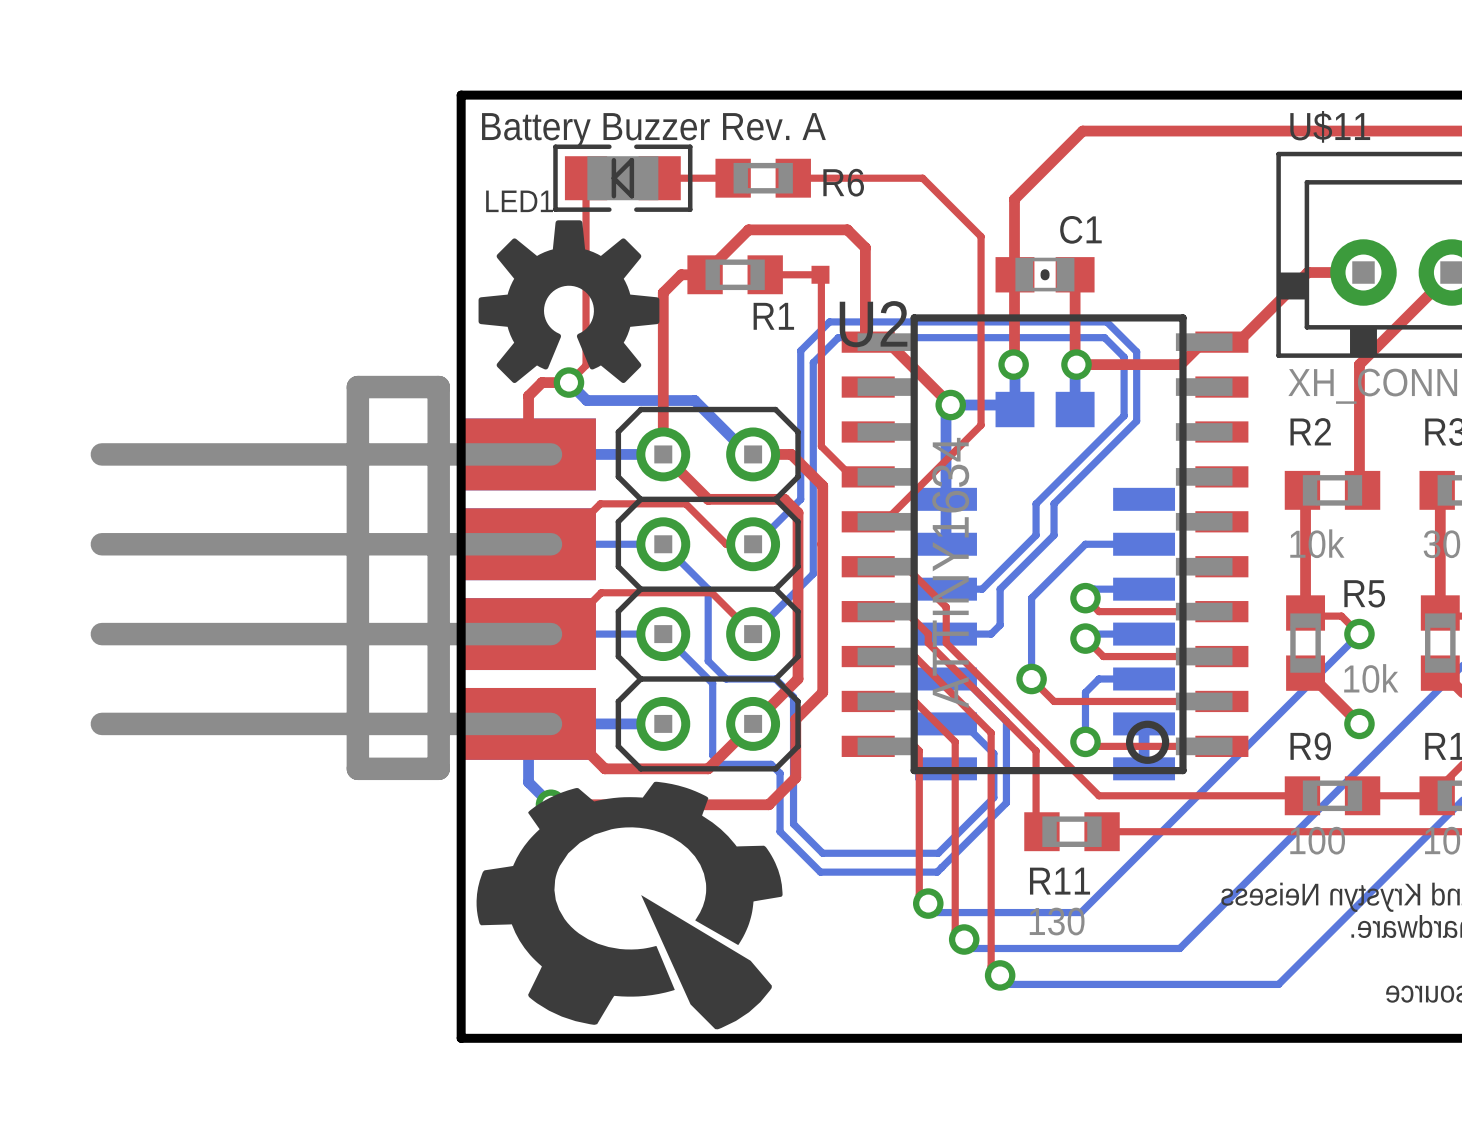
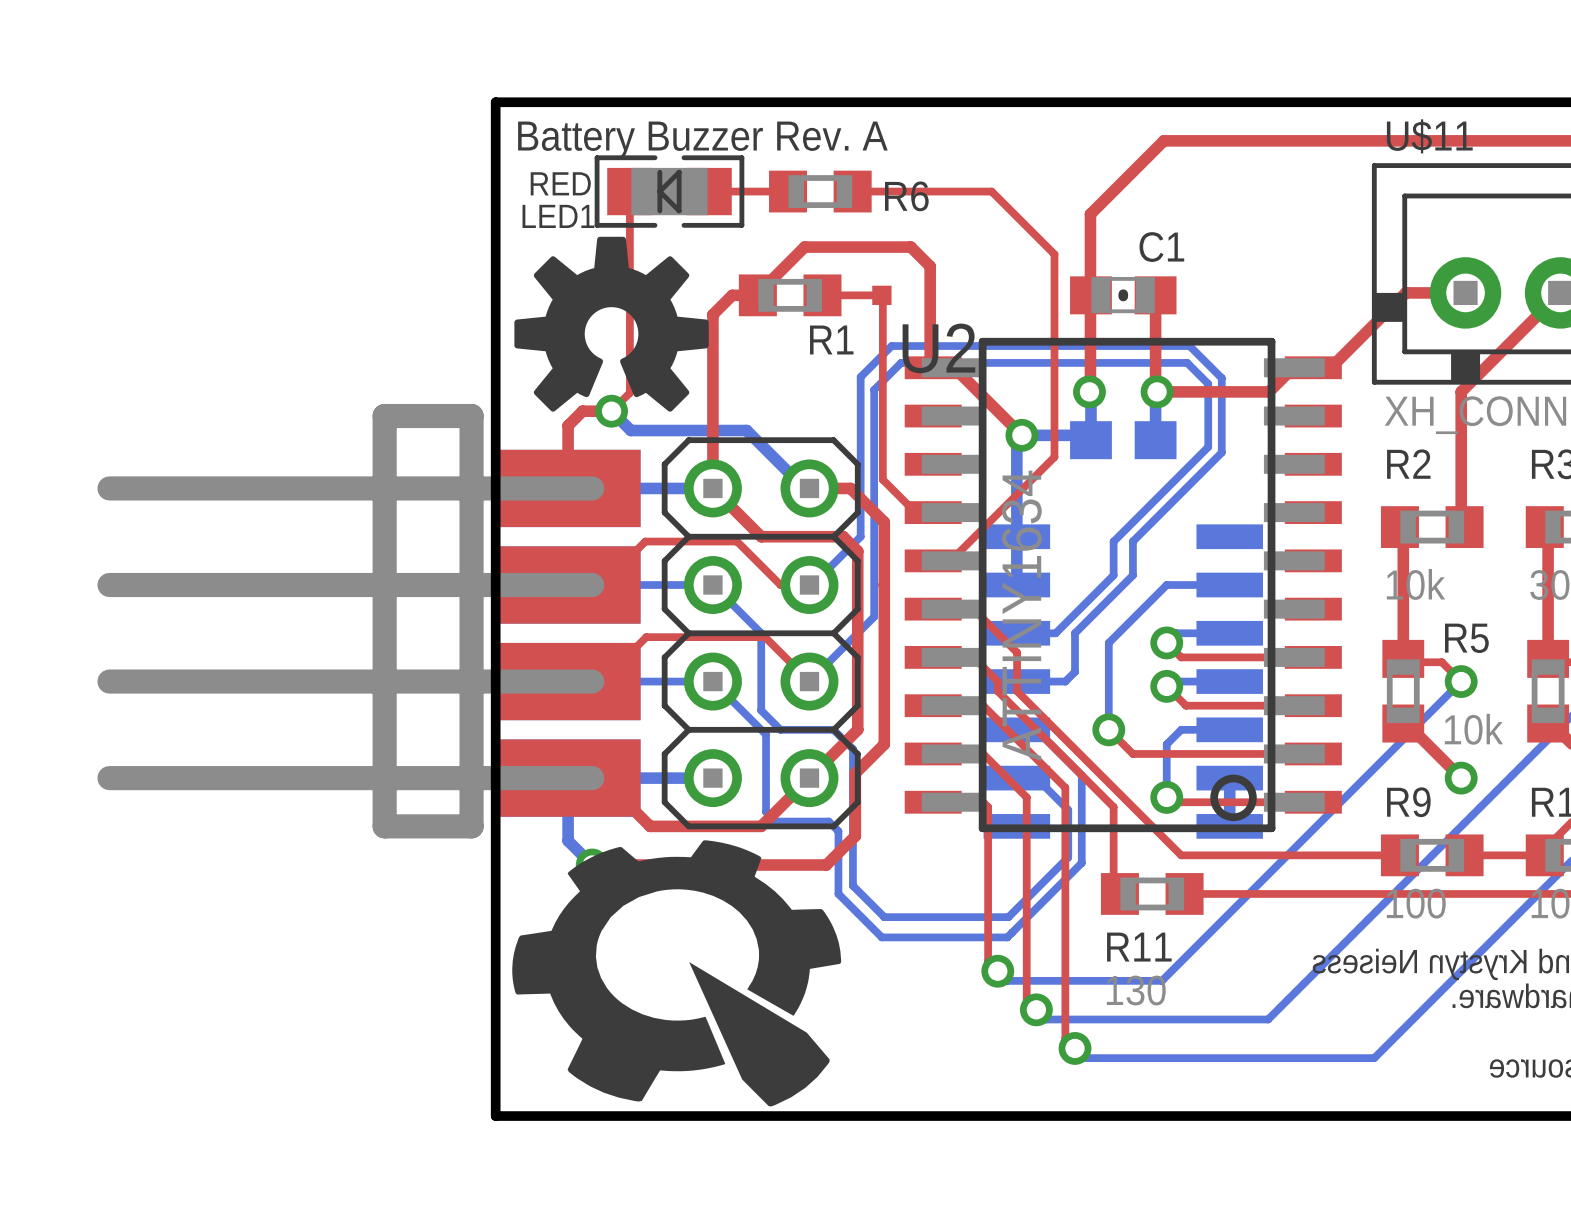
LED1 value: none -> RED (560, 183)

